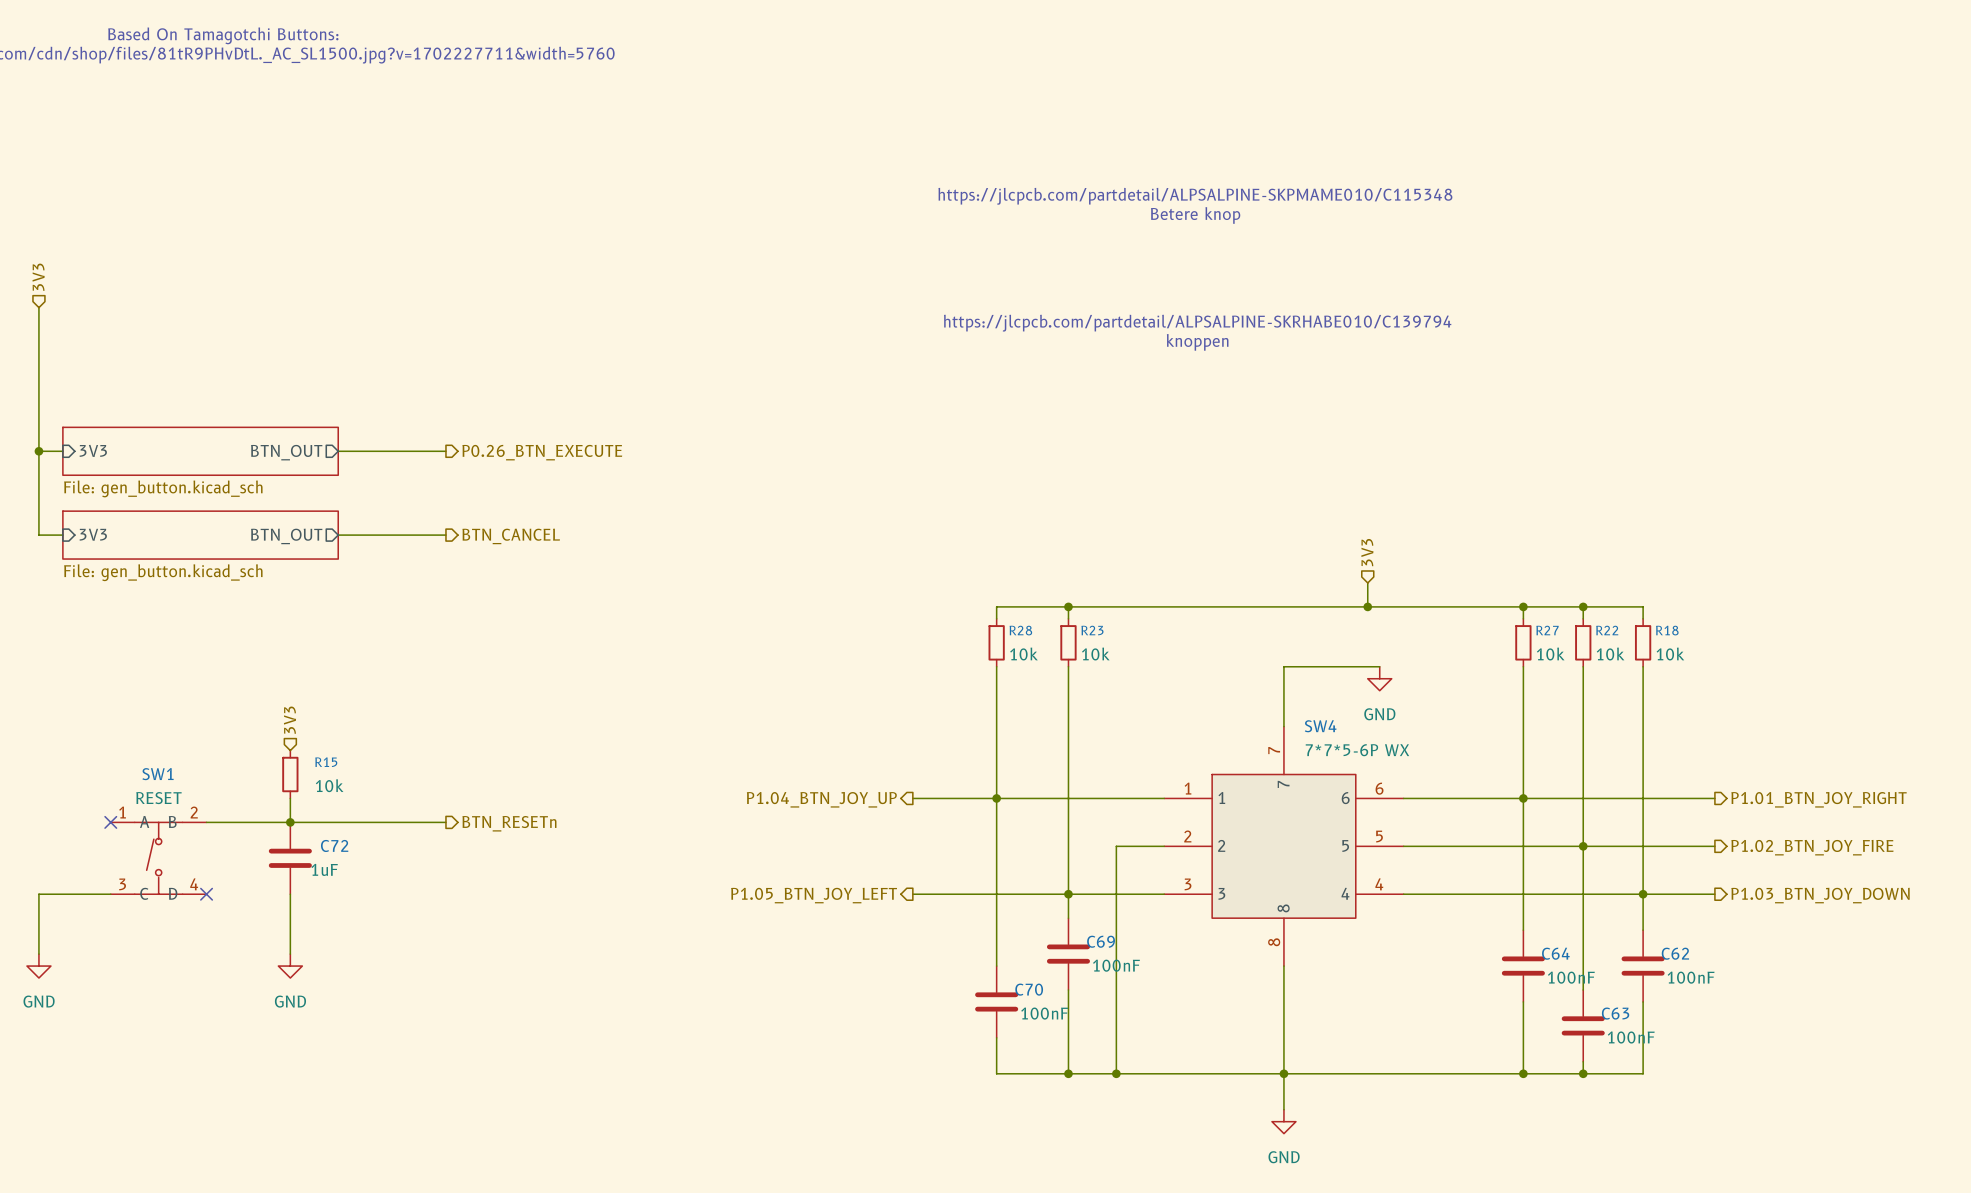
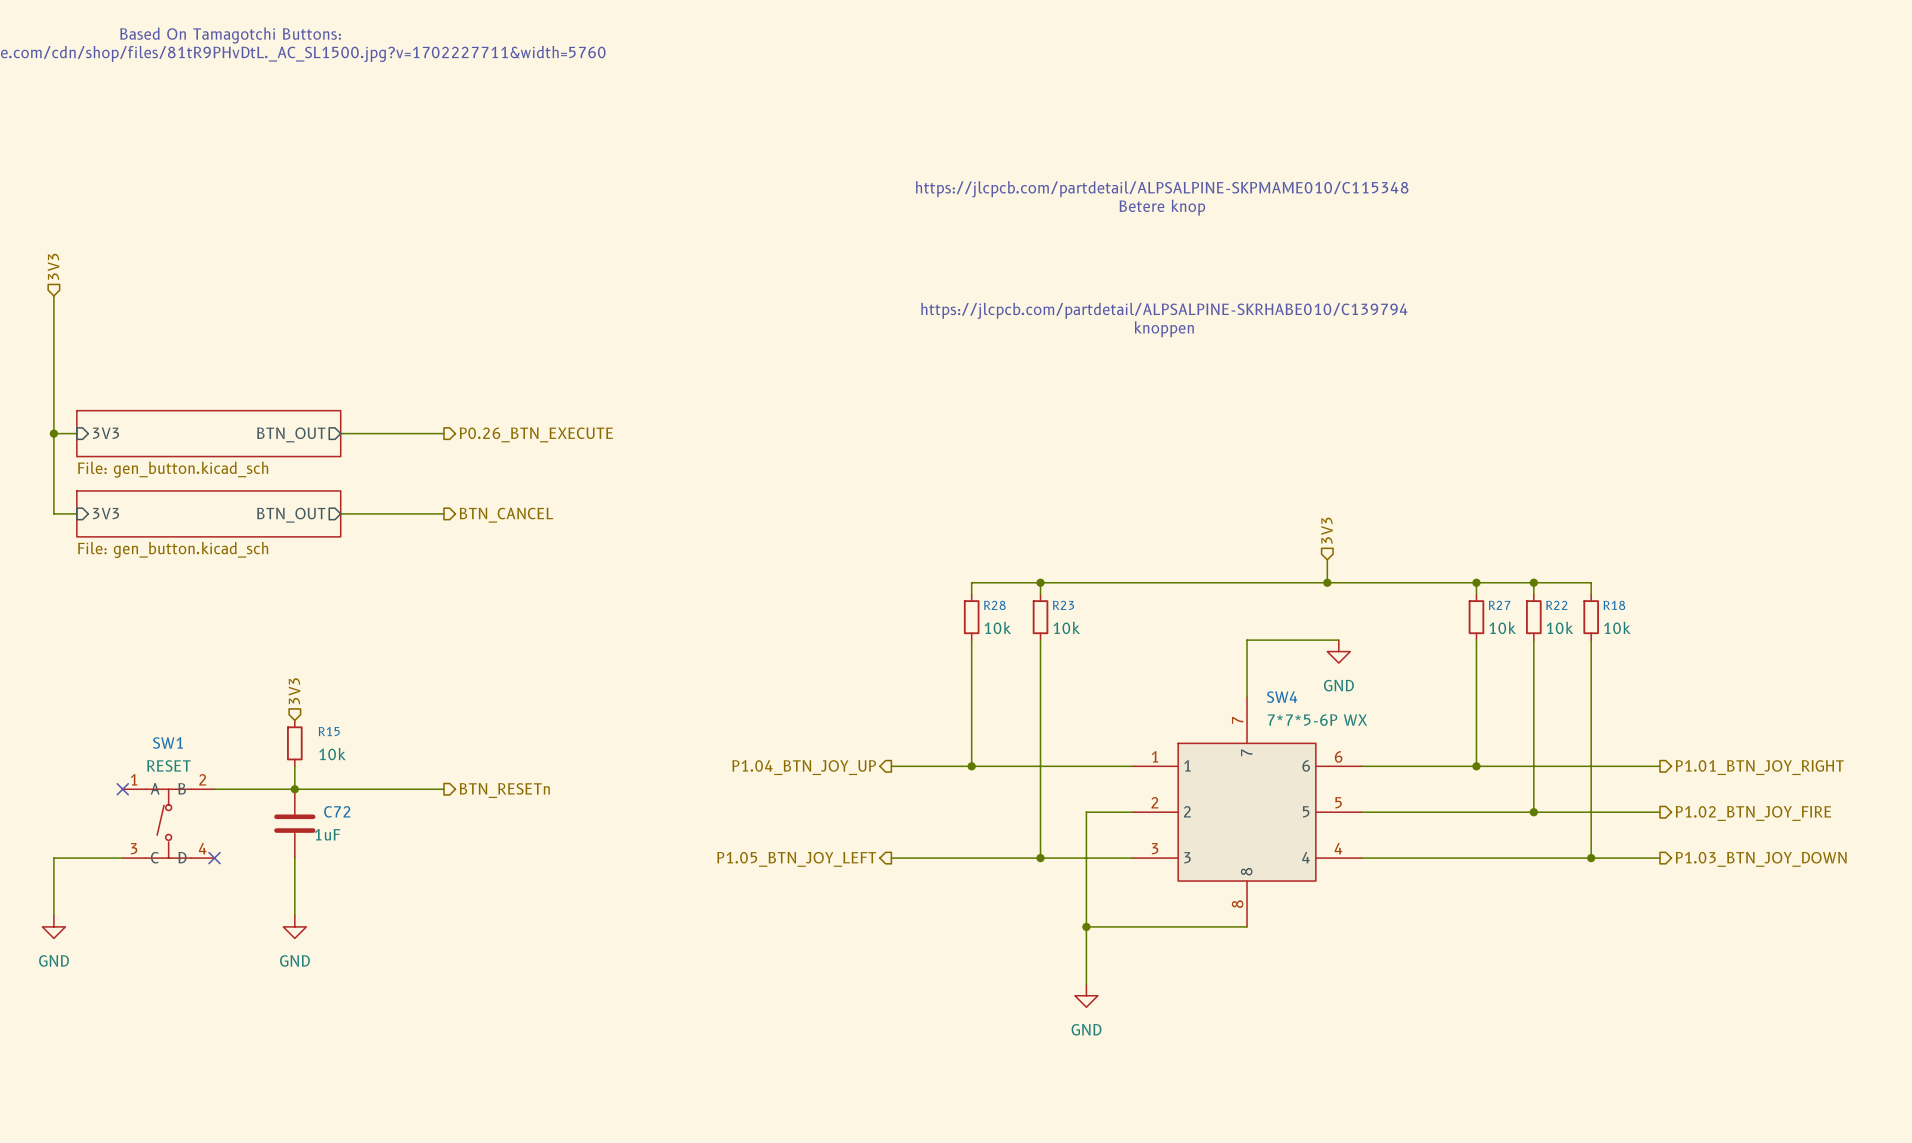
wire: (996, 798) (996, 966) -> none
wire: (1523, 798) (1523, 930) -> none
wire: (1583, 846) (1583, 989) -> none
wire: (1068, 894) (1068, 918) -> none
wire: (1643, 894) (1643, 930) -> none
C69: 100nF (1068, 954) -> none
junction: none -> (1086, 926)
wire: (1283, 966) (1283, 1109) -> (1247, 926) (1086, 926)
C64: 100nF (1523, 966) -> none
C62: 100nF (1643, 966) -> none
wire: (1068, 989) (1068, 1073) -> none
C70: 100nF (996, 1001) -> none
wire: (1523, 1001) (1523, 1073) -> none
wire: (1643, 1001) (1643, 1073) (996, 1073) (996, 1037) -> none
wire: (1116, 1025) (1116, 1073) -> none
C63: 100nF (1583, 1025) -> none
wire: (1583, 1061) (1583, 1073) -> none
junction: (1068, 1073) -> none
junction: (1116, 1073) -> none
junction: (1283, 1073) -> none
junction: (1523, 1073) -> none
junction: (1583, 1073) -> none
power symbol position: GND (1283, 1121) -> GND (1086, 995)

